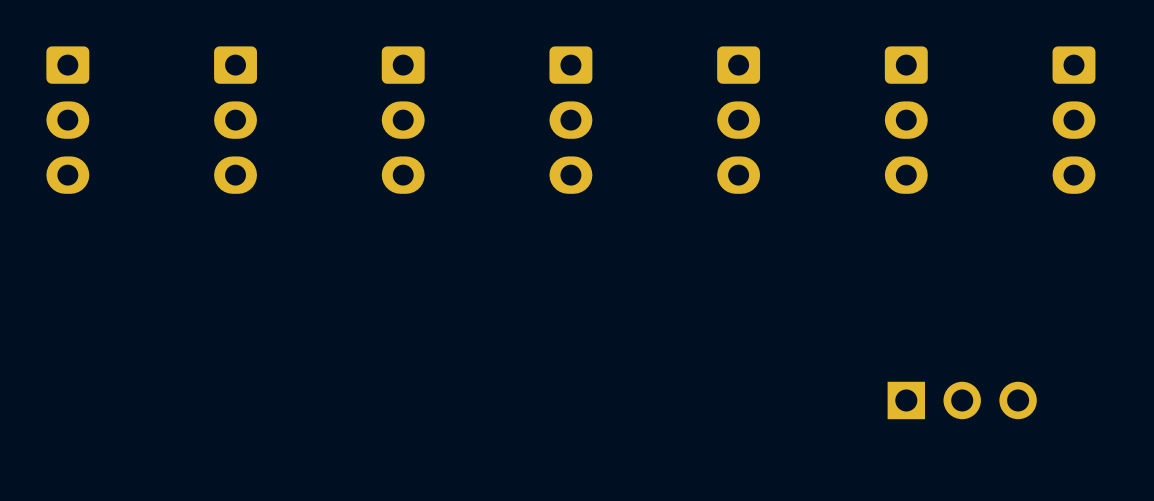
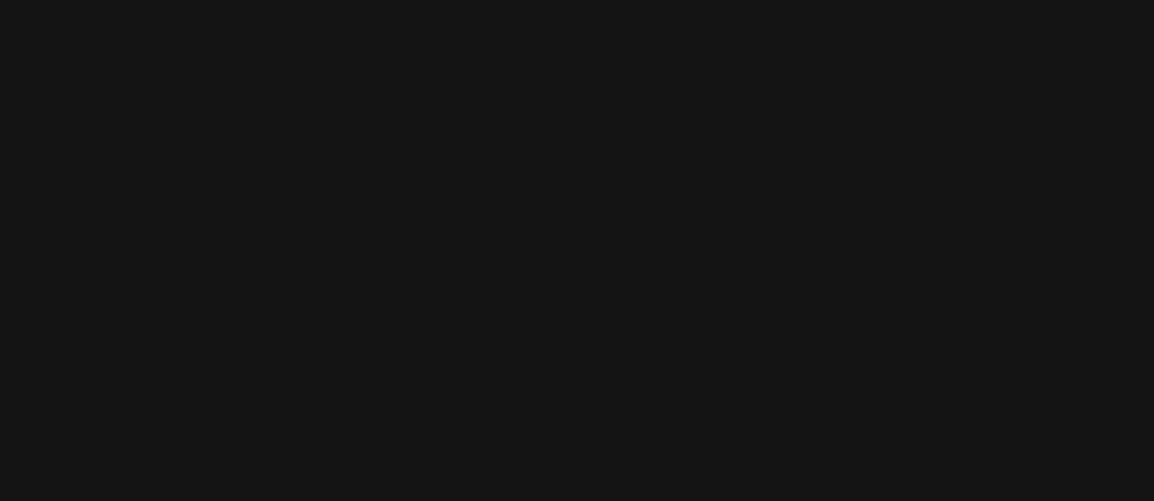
part: (67, 120) -> none
part: (235, 120) -> none
part: (403, 120) -> none
part: (570, 120) -> none
part: (738, 120) -> none
part: (906, 120) -> none
part: (1074, 120) -> none
part: (962, 400) -> none

